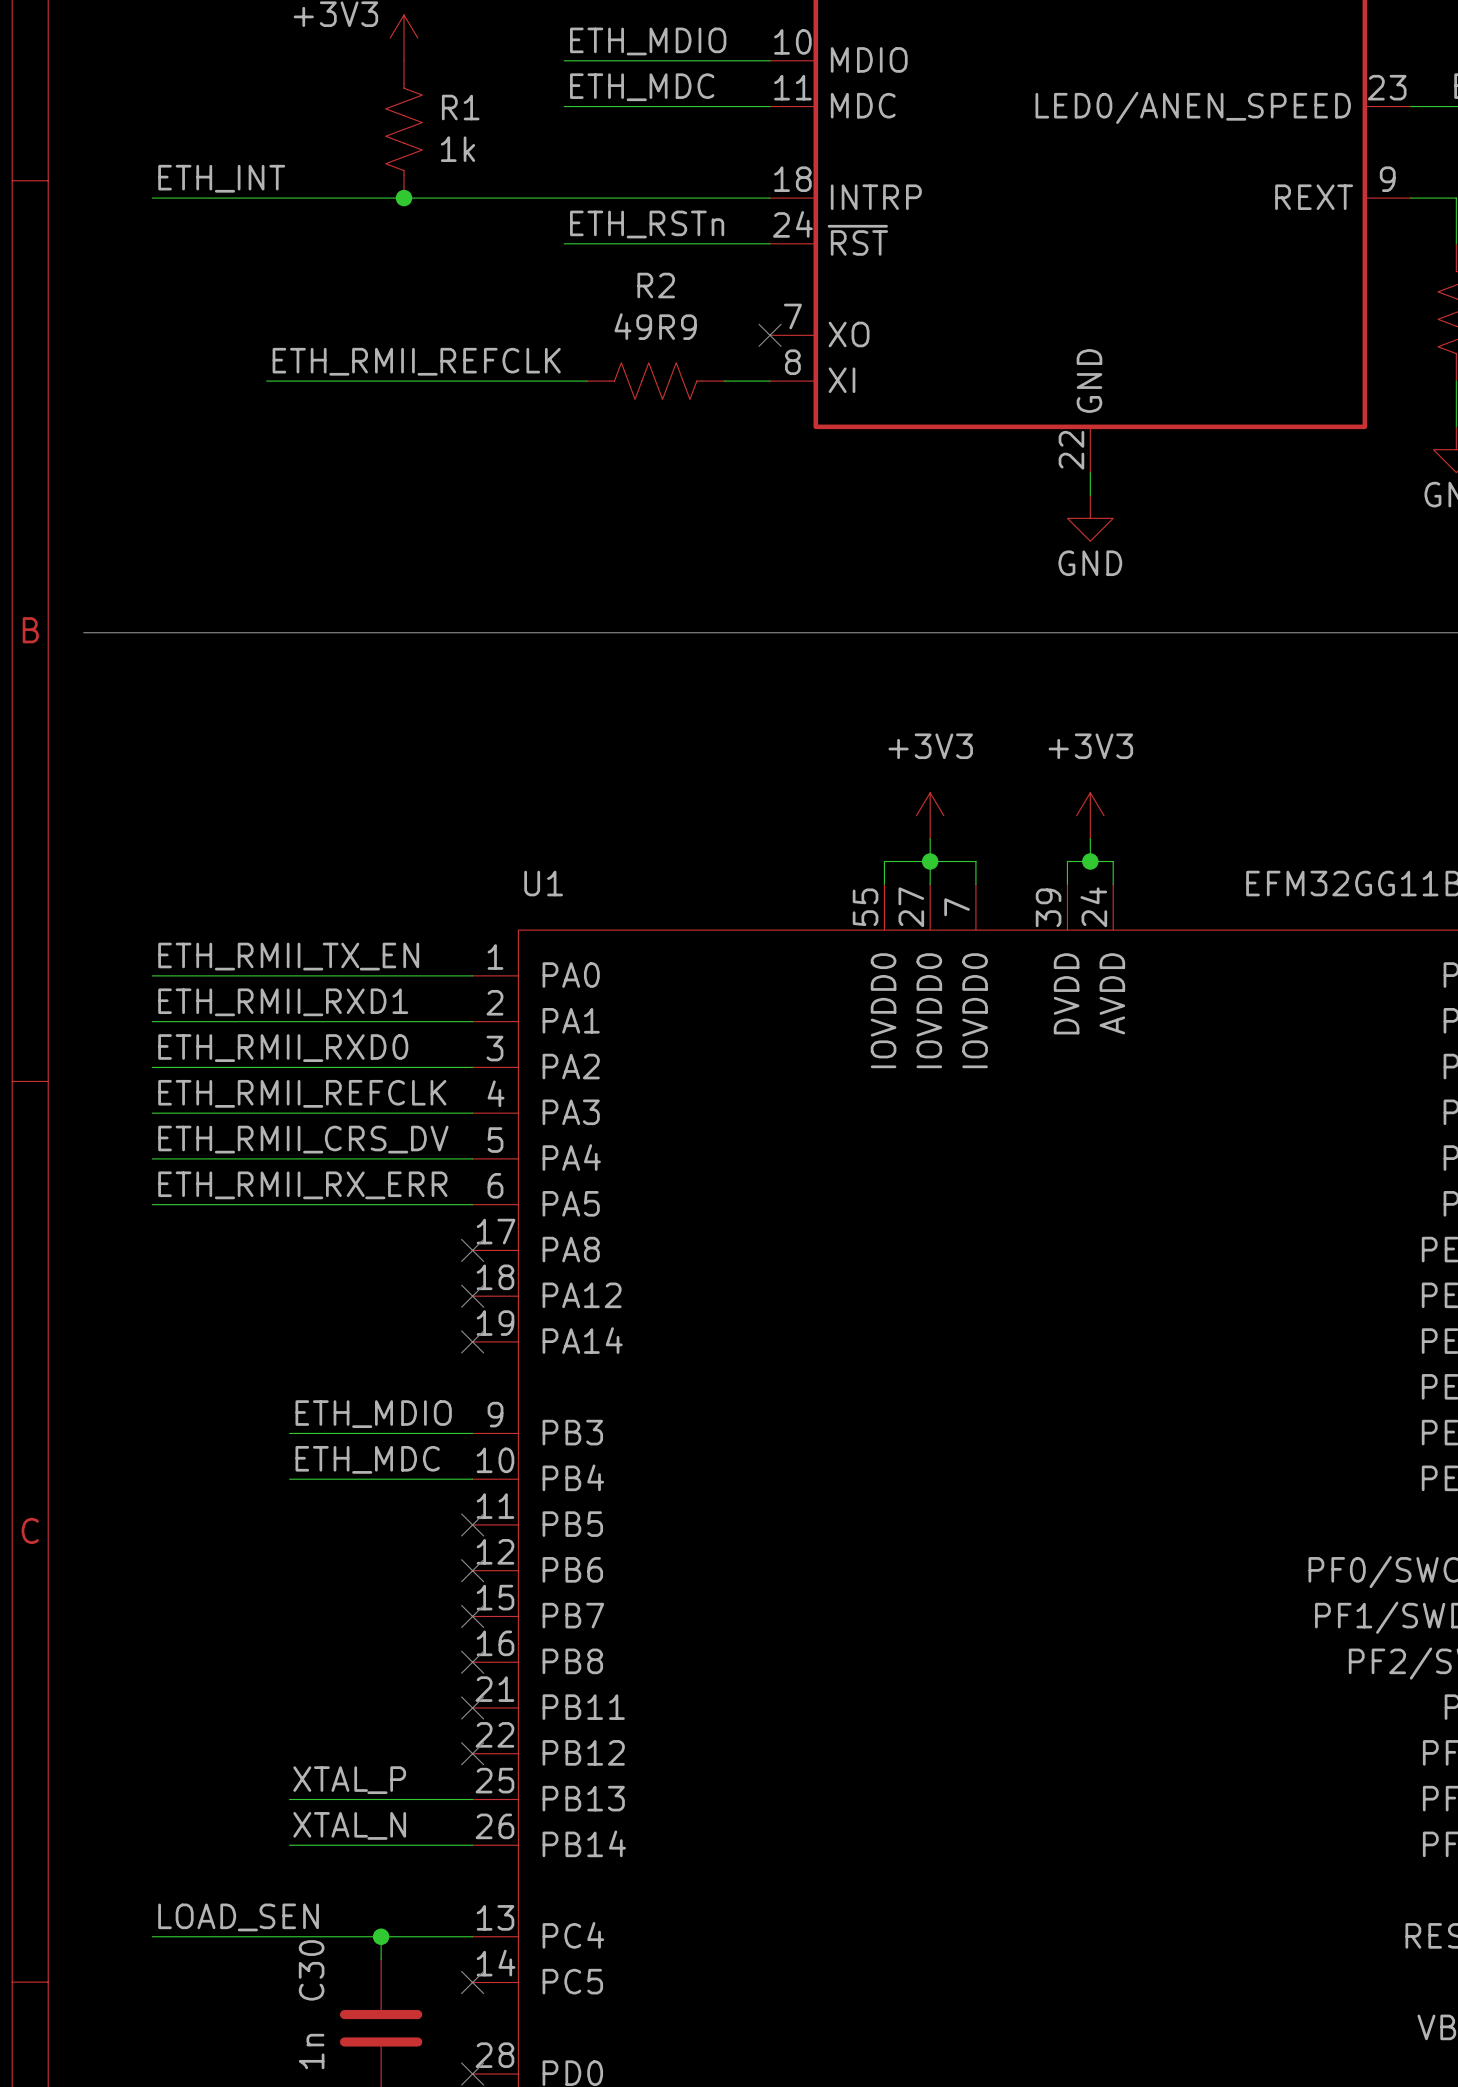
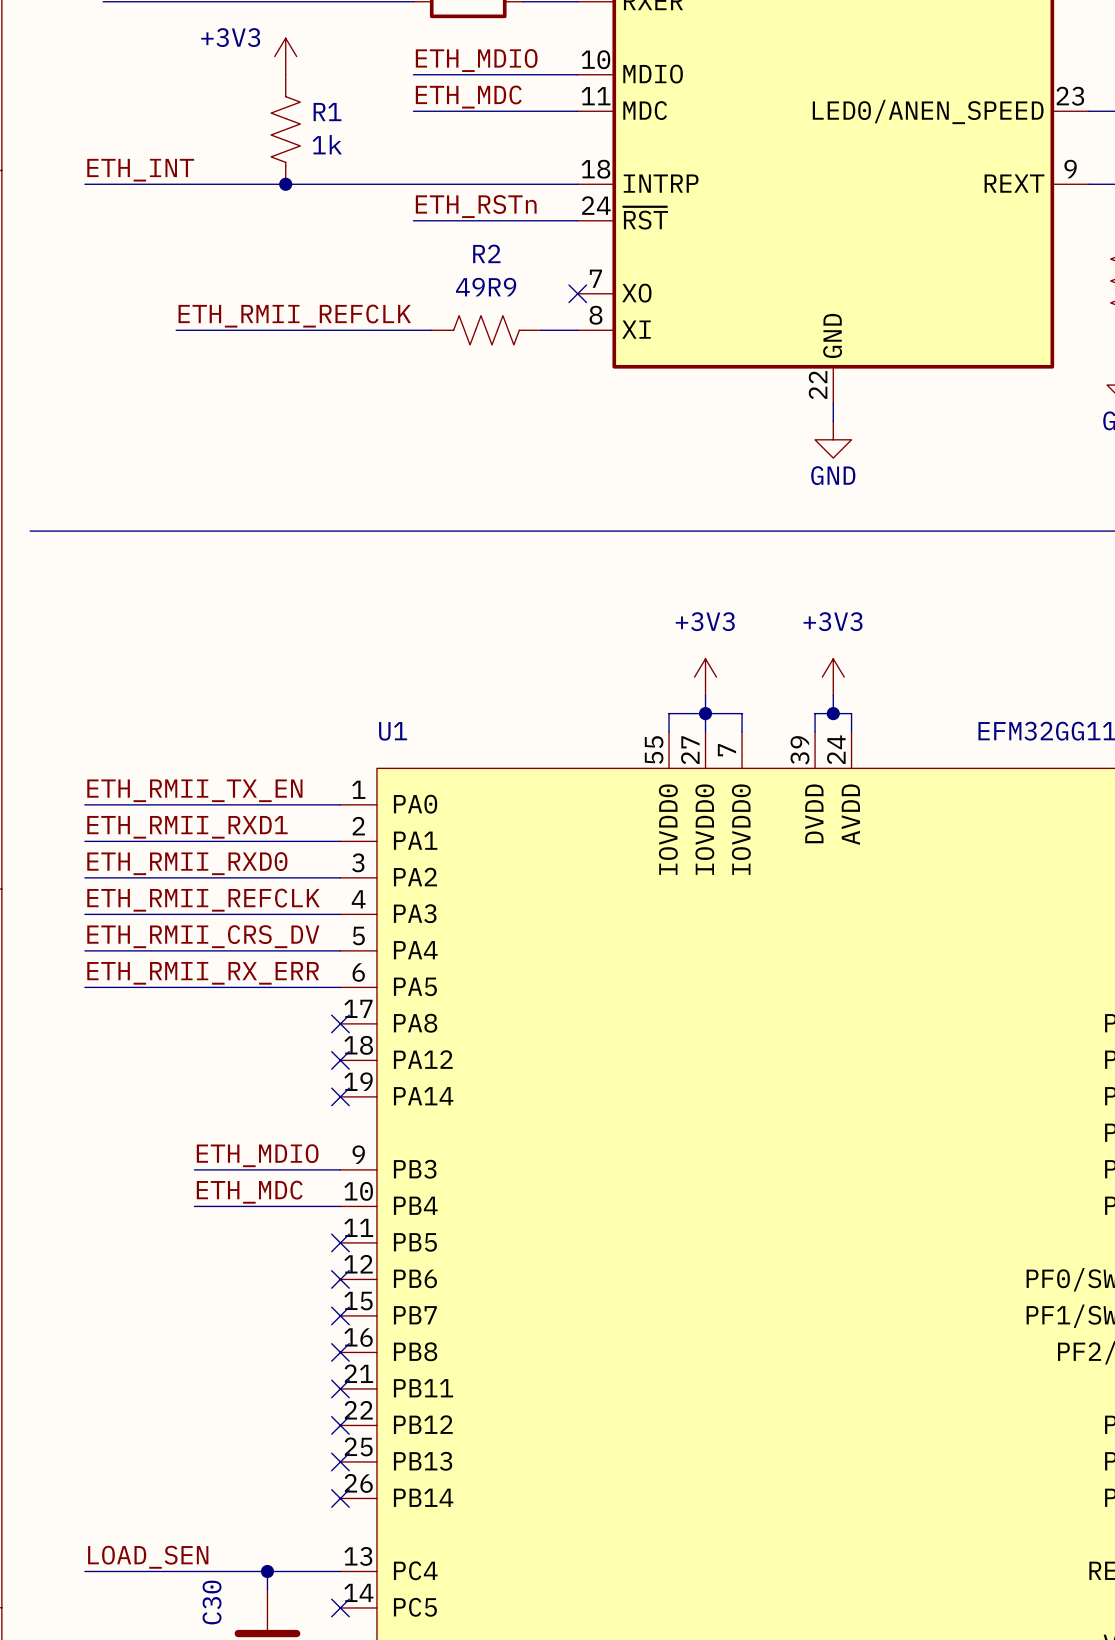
label: XTAL_P (349, 1780) -> none
wire: (289, 1799) (472, 1799) -> none
no-connect mark: none -> (340, 1461)
label: XTAL_N (349, 1825) -> none
wire: (289, 1845) (472, 1845) -> none
no-connect mark: none -> (340, 1498)

